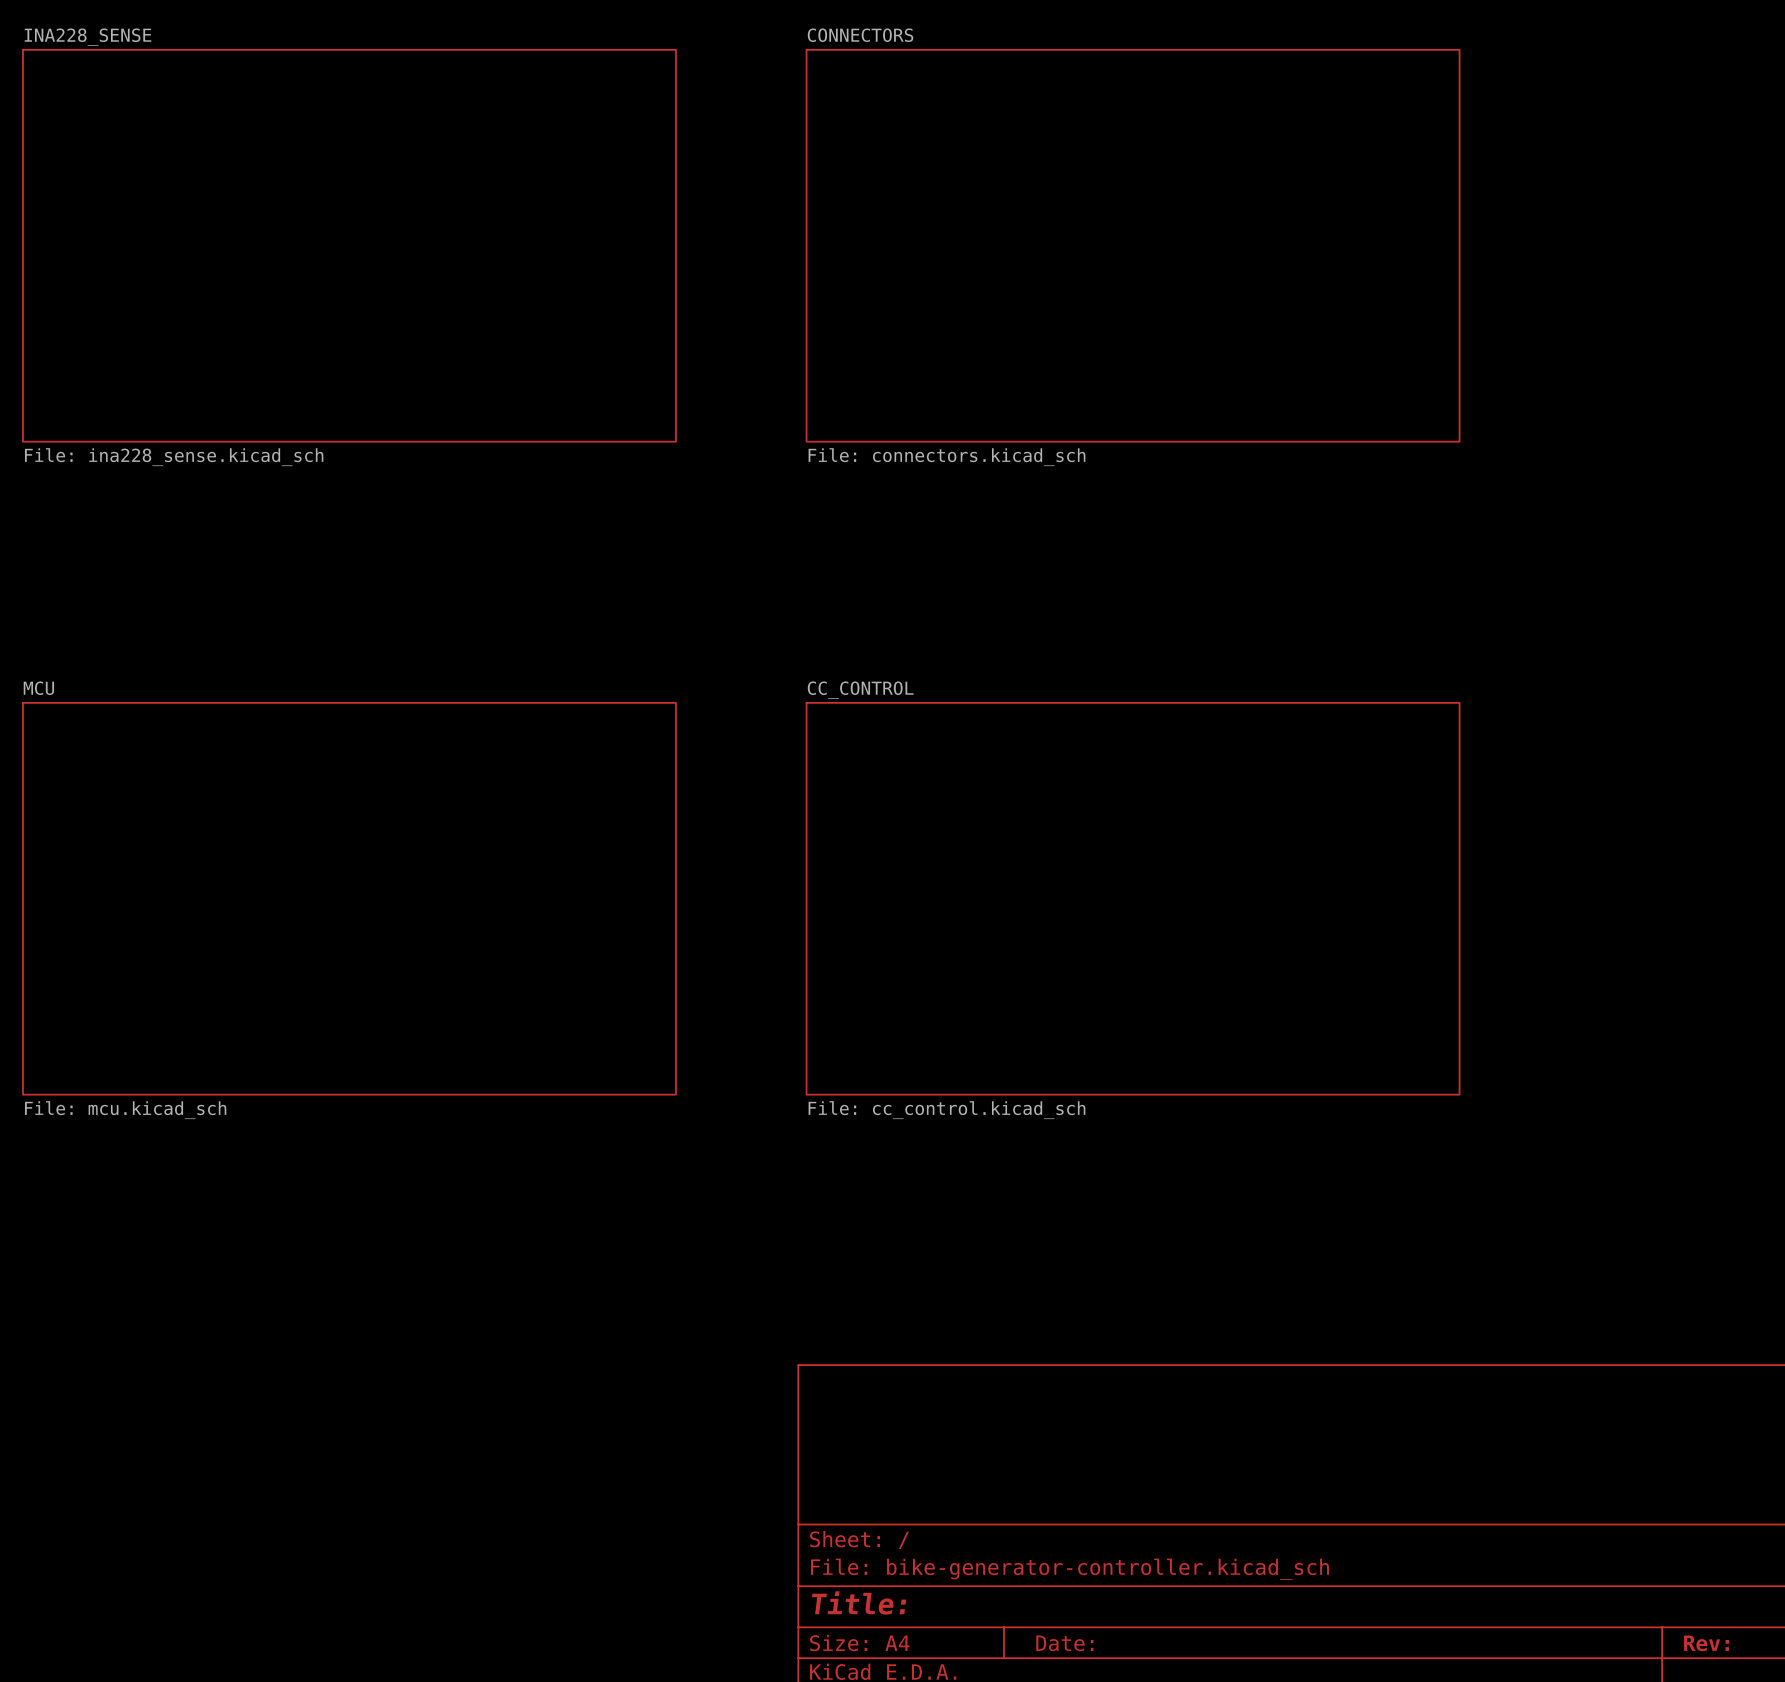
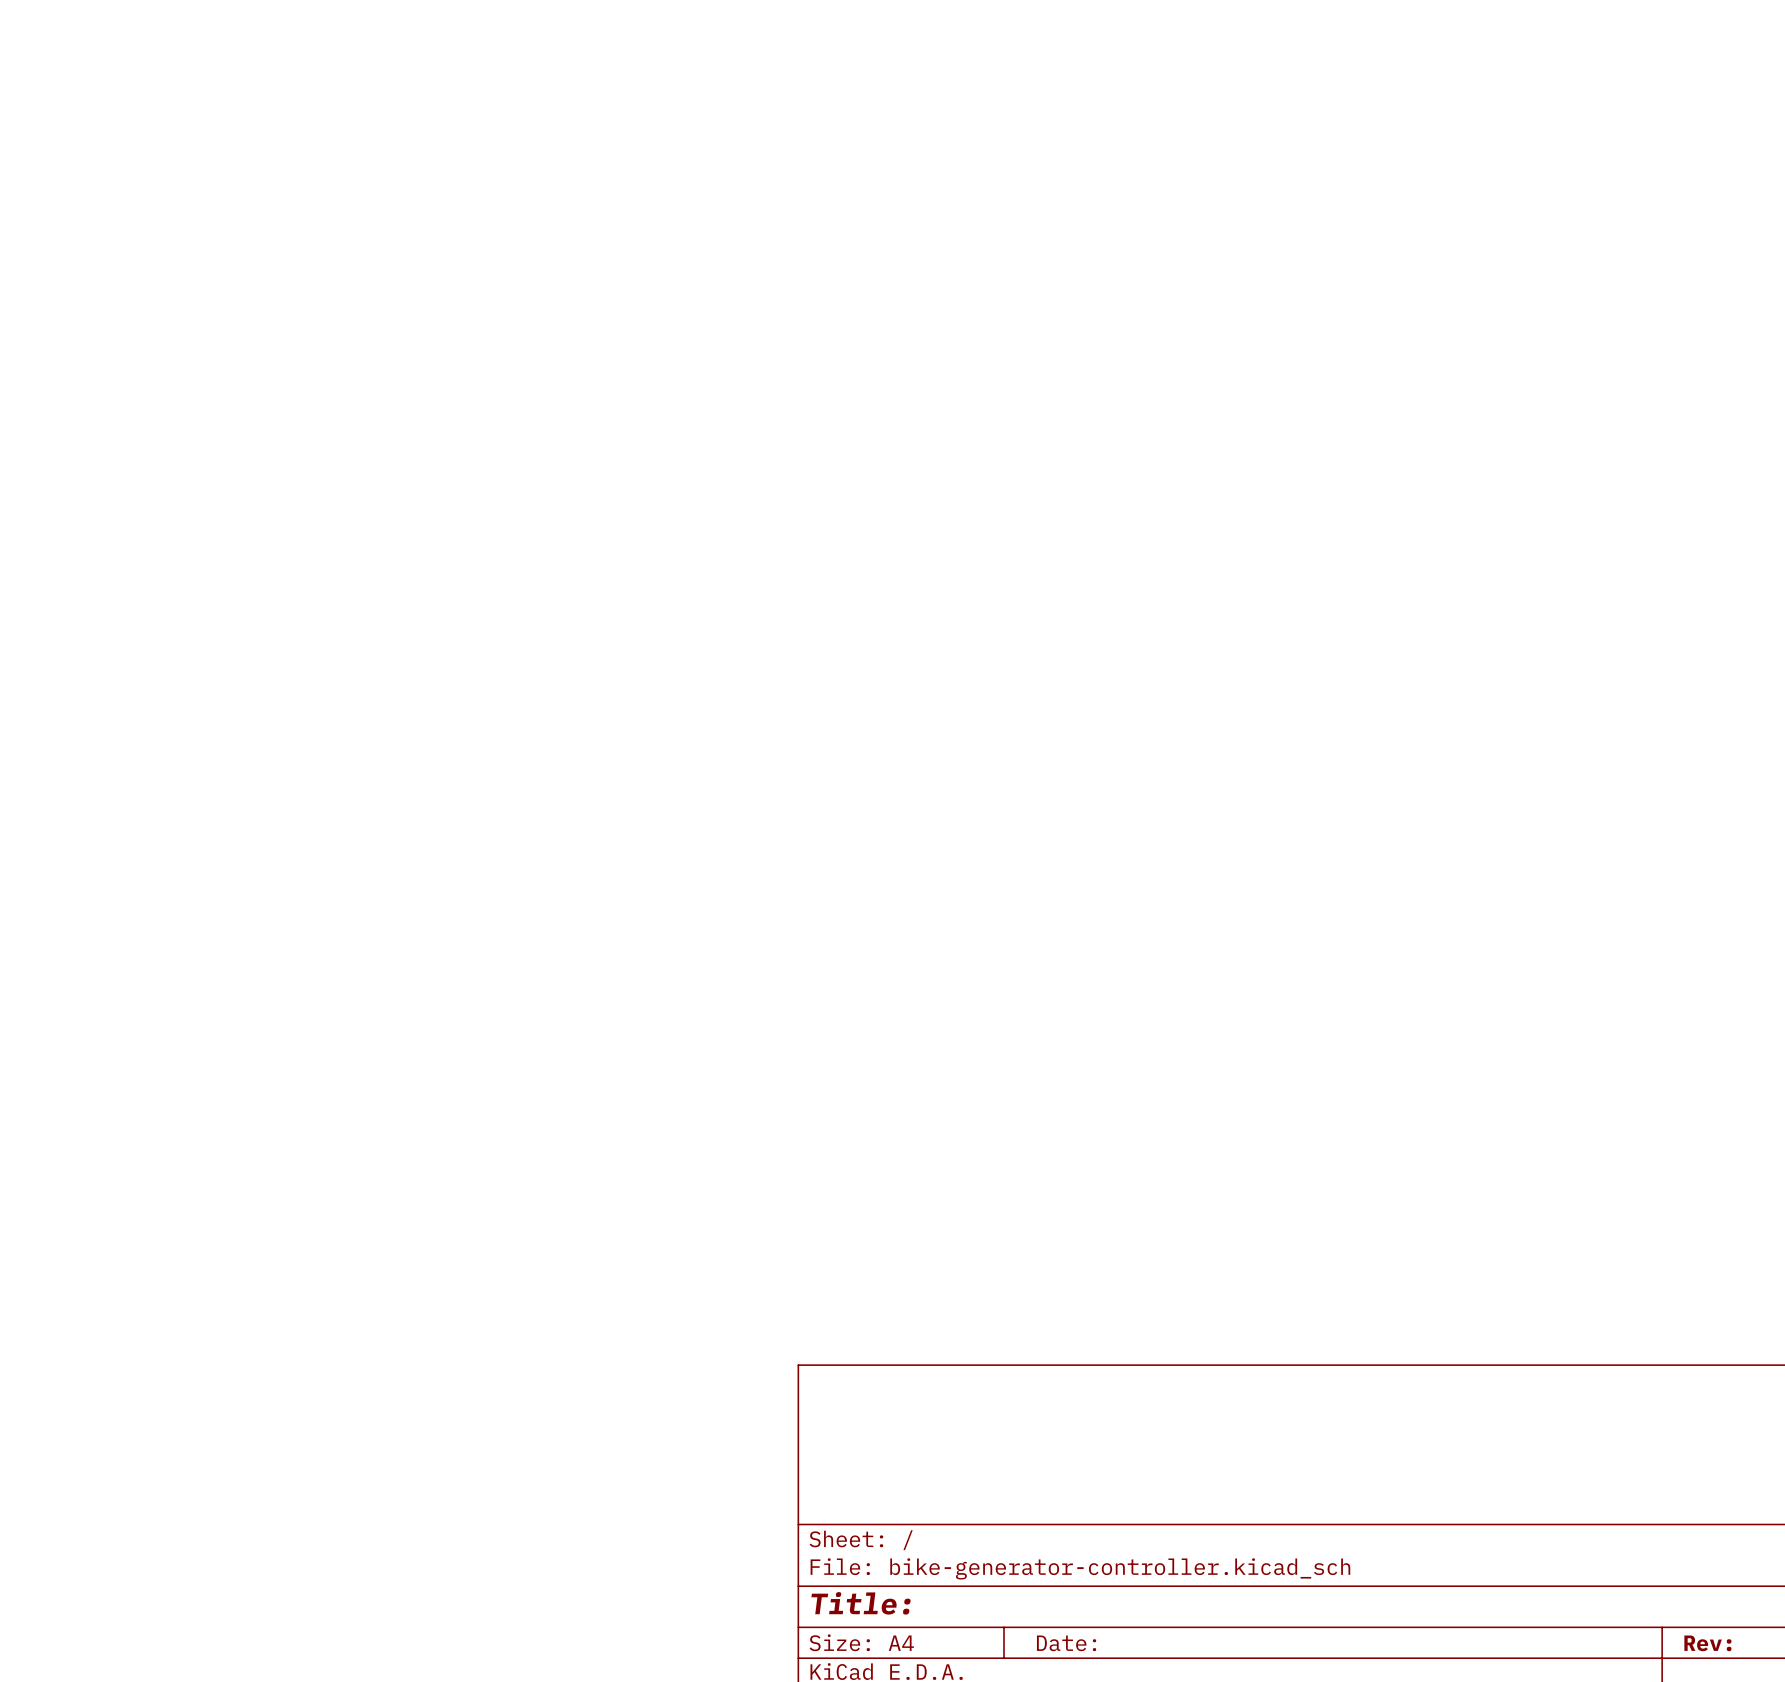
sheet INA228_SENSE: File: ina228_sense.kicad_sch (349, 245) -> none
sheet CONNECTORS: File: connectors.kicad_sch (1133, 245) -> none
sheet MCU: File: mcu.kicad_sch (349, 898) -> none
sheet CC_CONTROL: File: cc_control.kicad_sch (1133, 898) -> none

